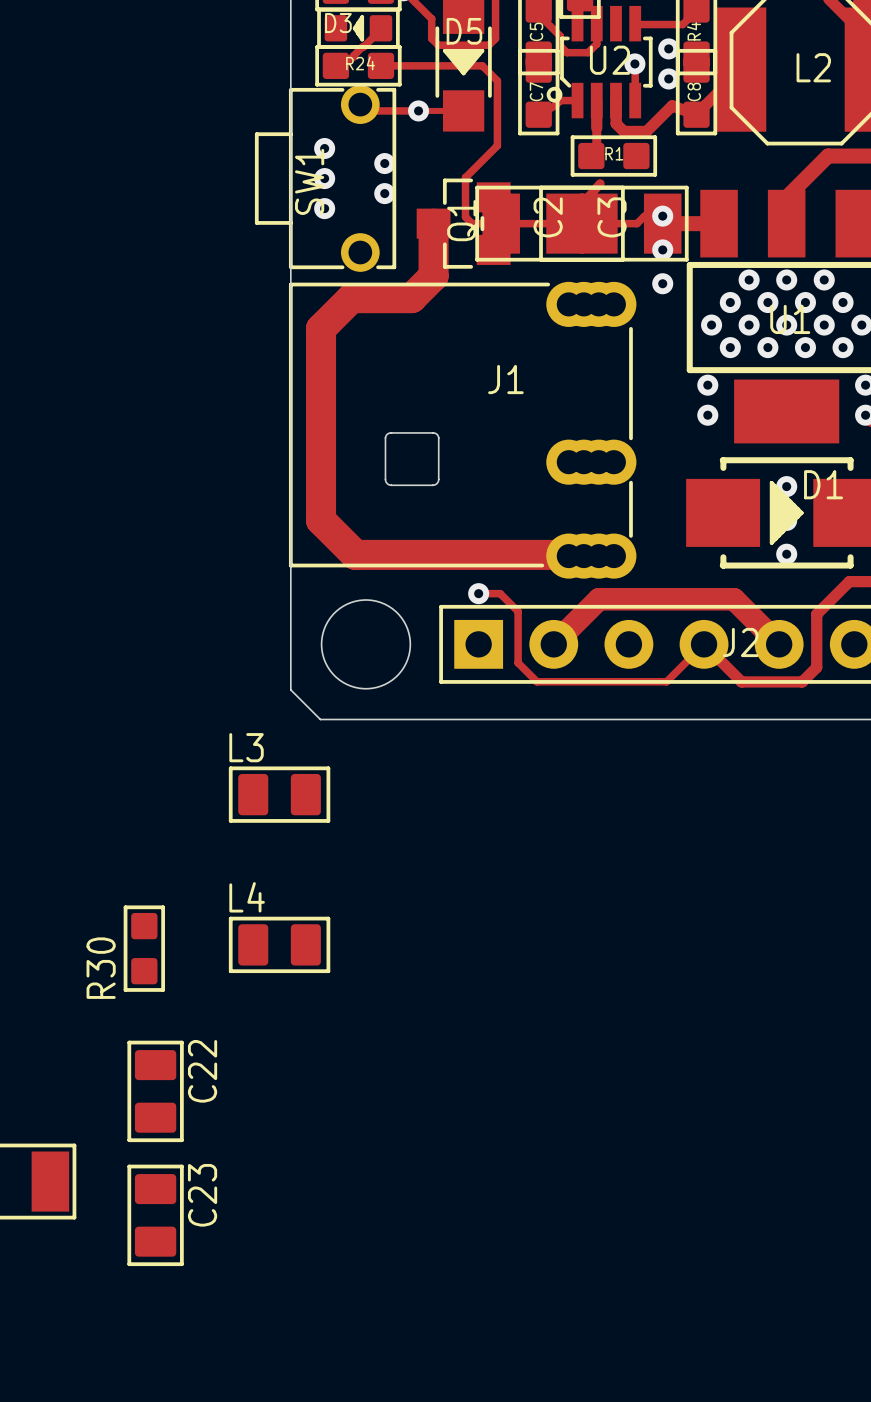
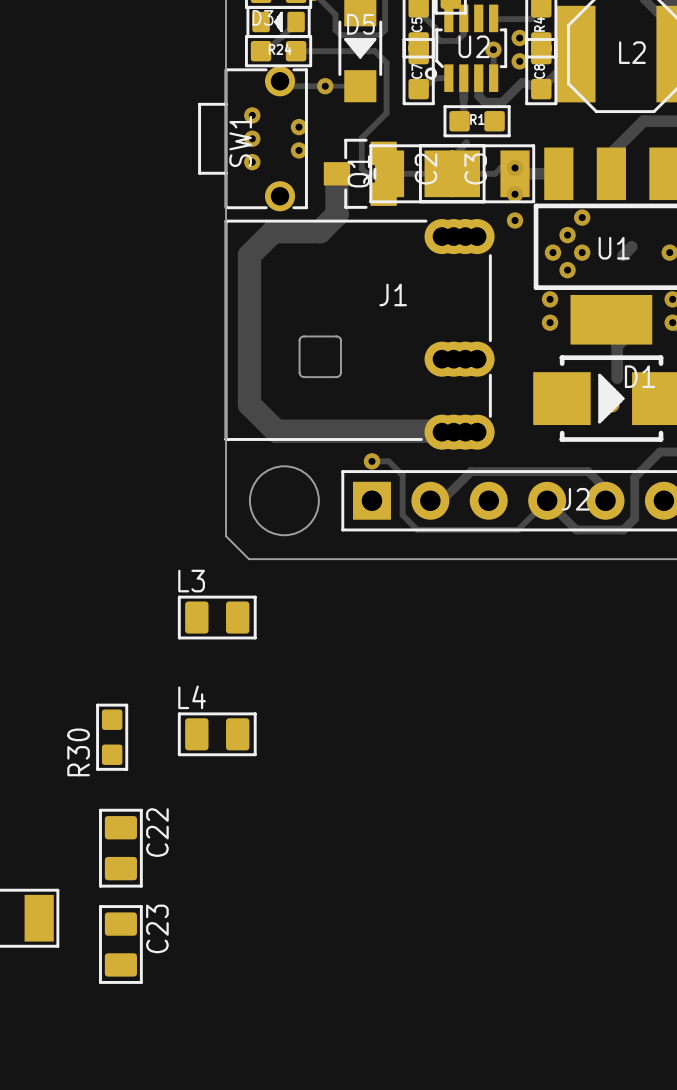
via: (786, 279) -> none
via: (824, 279) -> none
via: (767, 302) -> none
via: (805, 302) -> none
via: (843, 302) -> none
track: none -> (631, 246) (623, 255)
via: (786, 325) -> none
via: (824, 325) -> none
via: (767, 347) -> none
via: (805, 347) -> none
via: (843, 347) -> none
track: none -> (623, 340) (617, 346) (617, 378)
via: (786, 486) -> none
via: (786, 554) -> none
track: none -> (617, 500) (588, 471) (471, 471) (441, 500)
track: (553, 644) (598, 599) (734, 599) (779, 644) -> none

